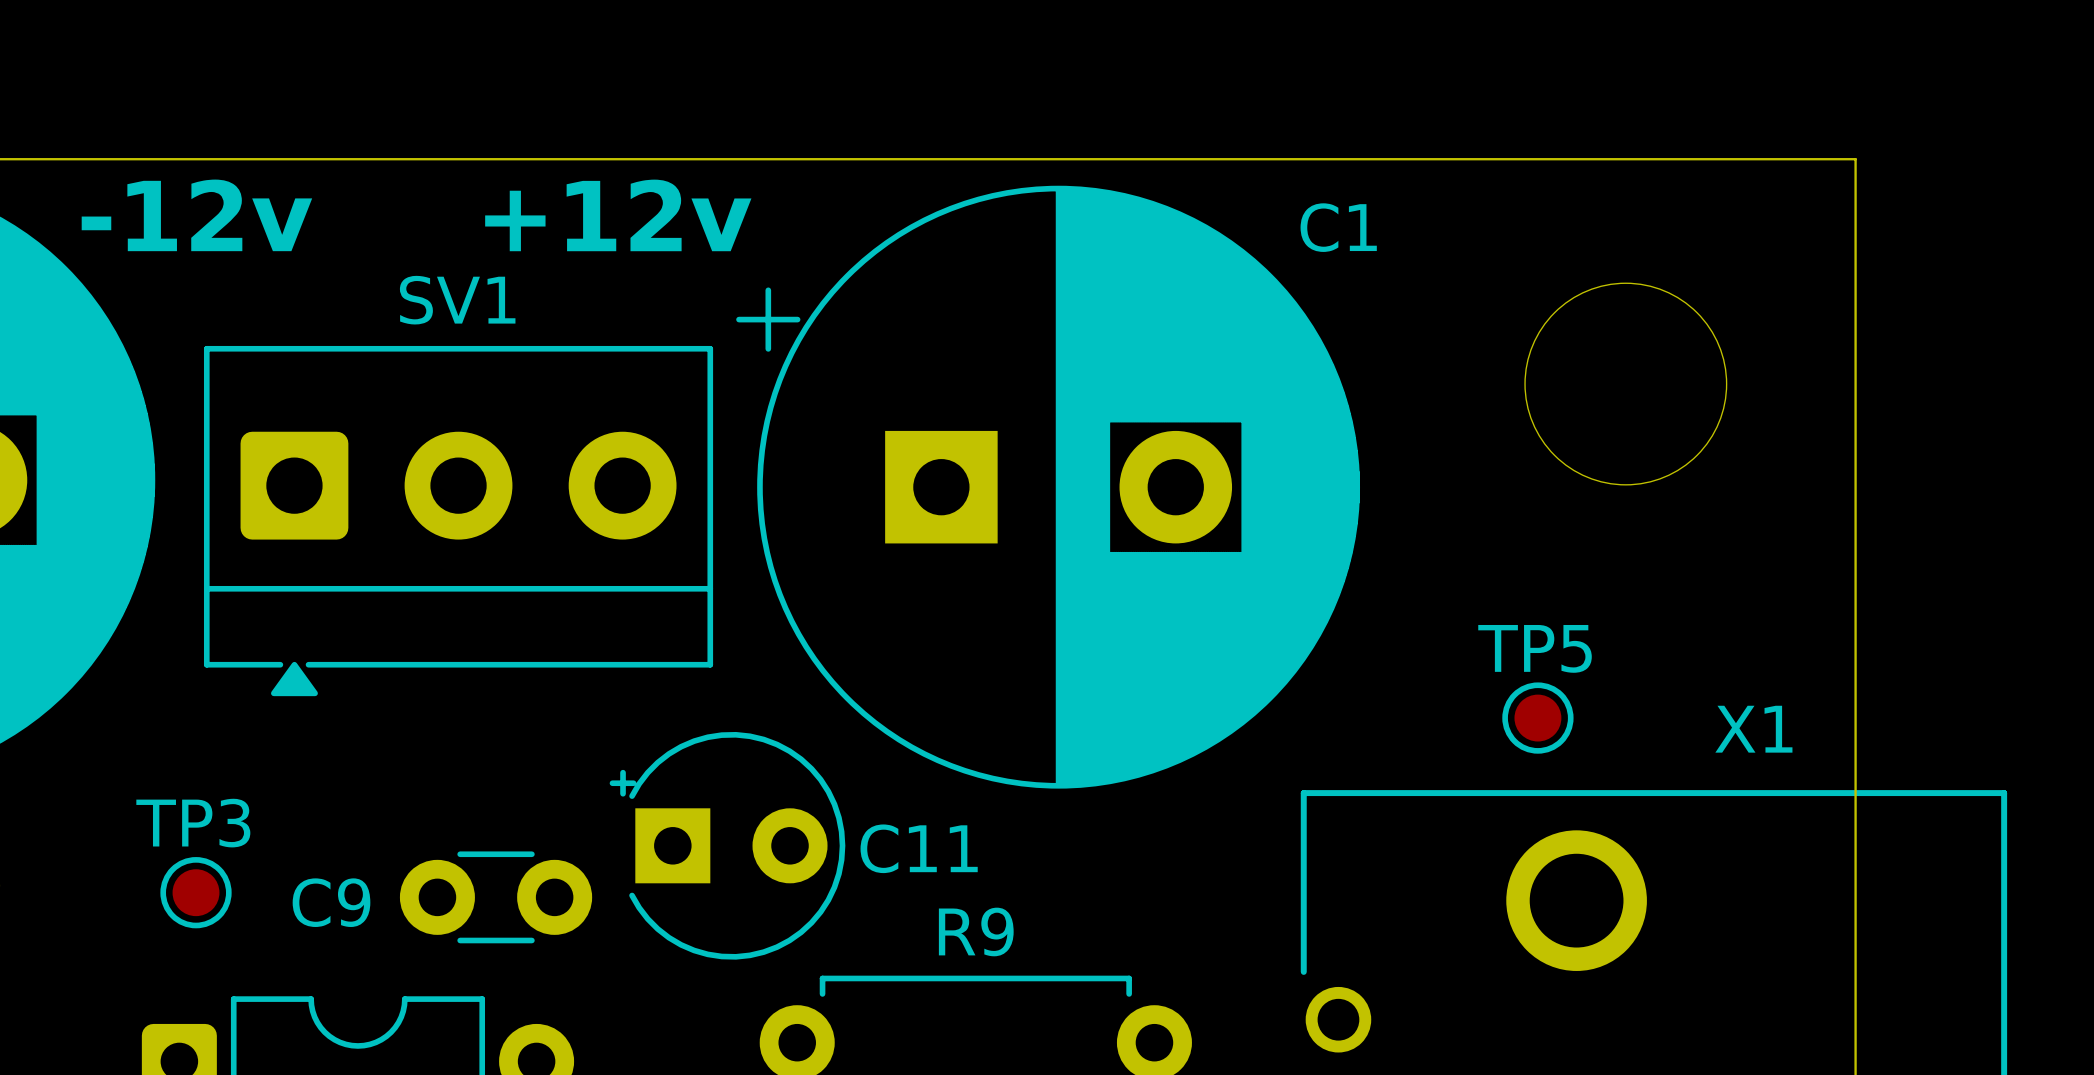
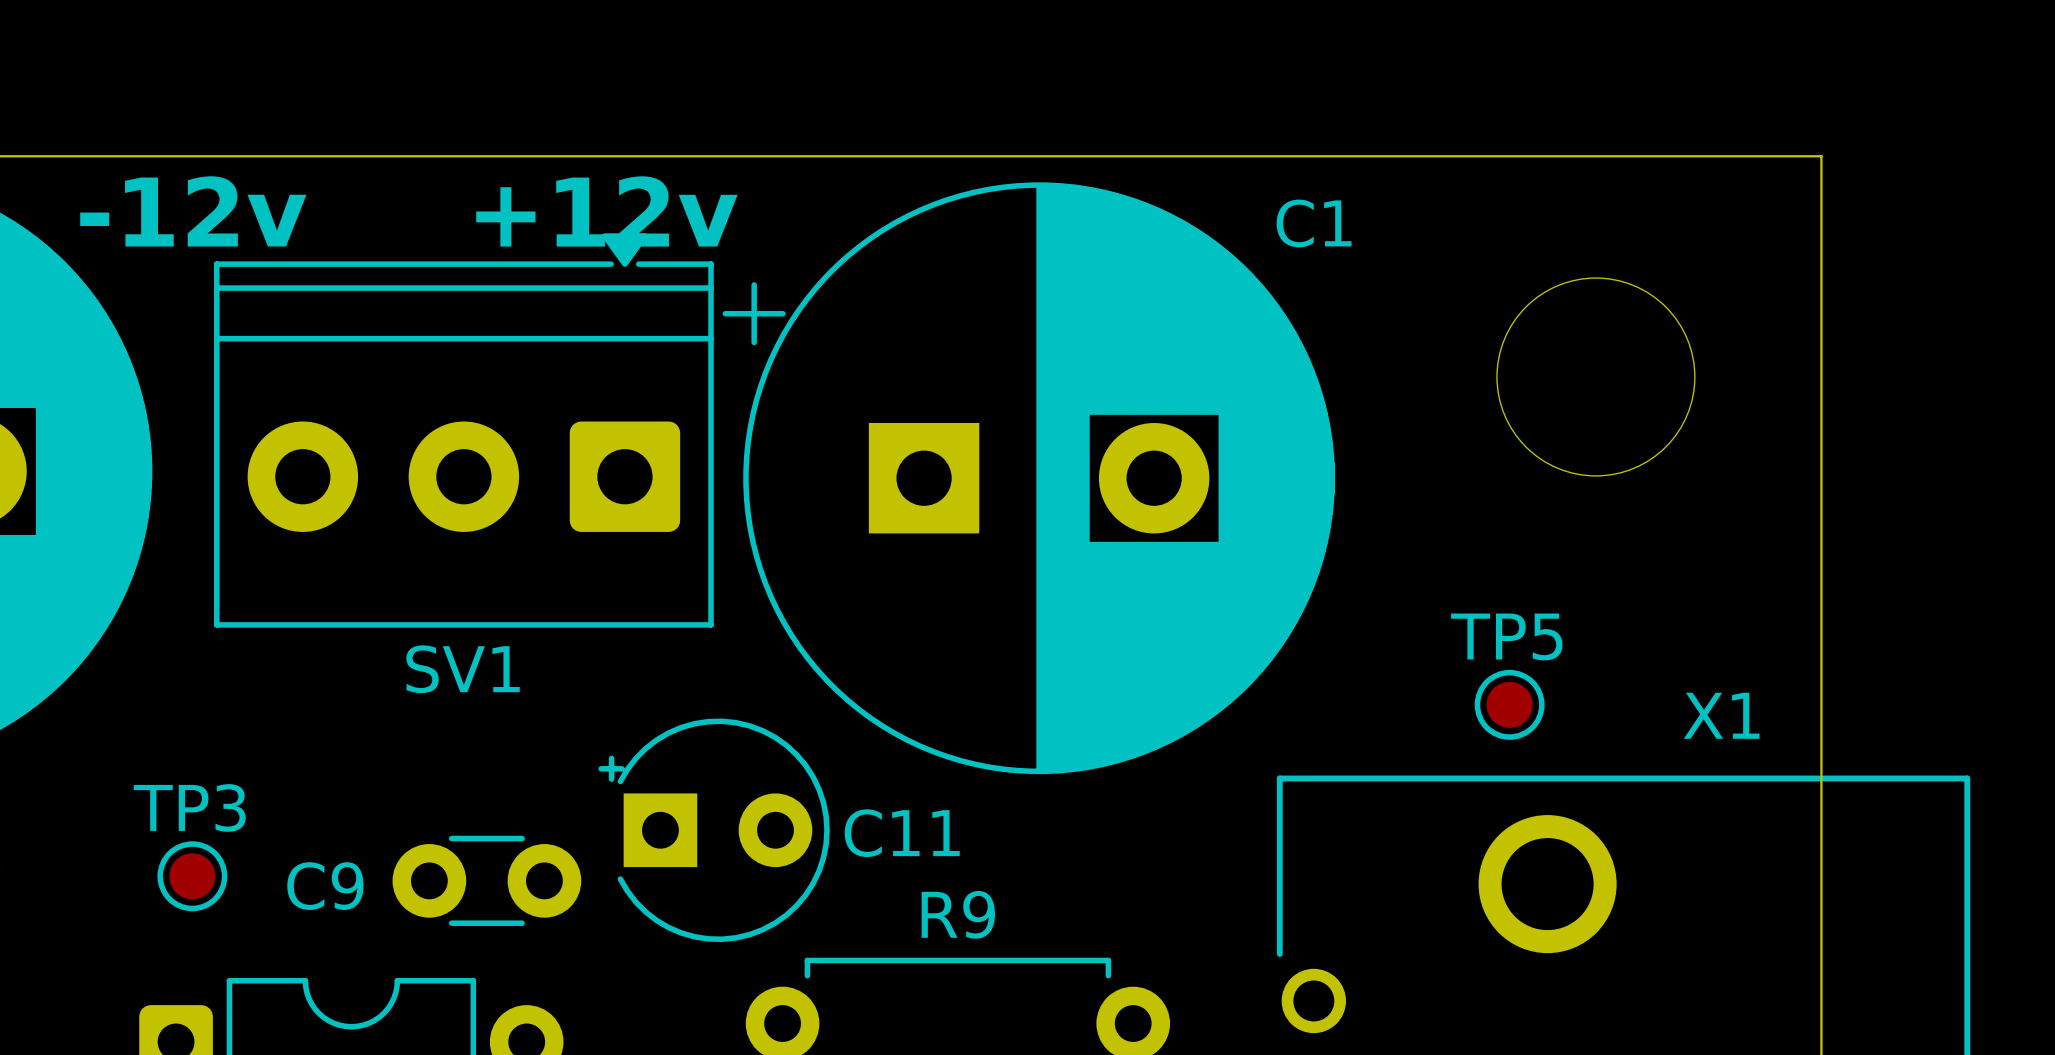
SV1 name position: SV1 (457, 300) -> SV1 (463, 669)
SV1 footprint: [203, 345, 714, 697] -> [214, 233, 714, 628]

